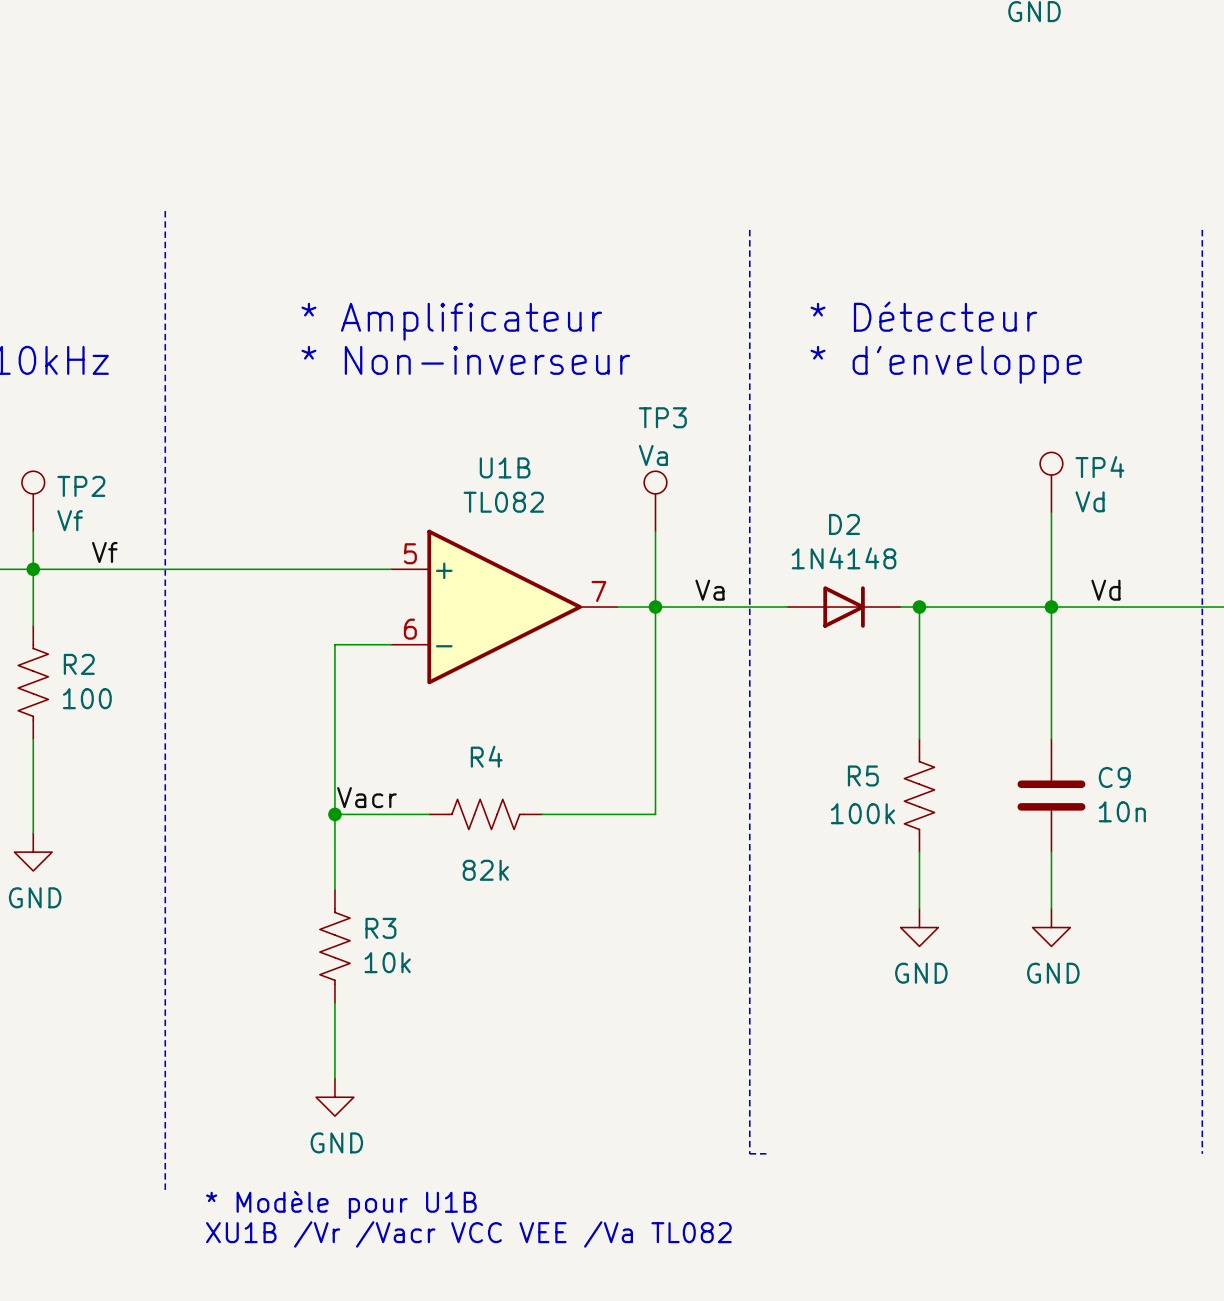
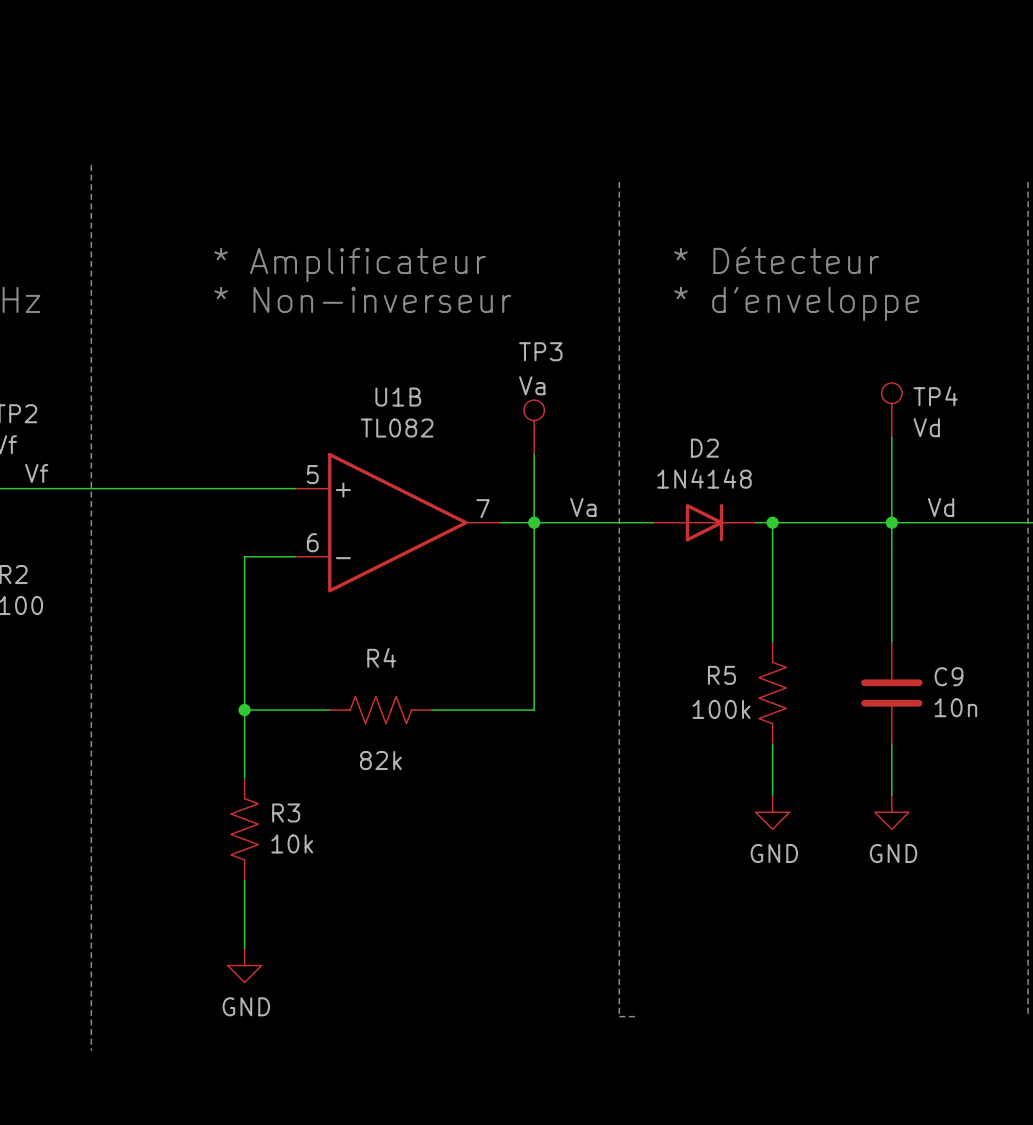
label: Vacr (366, 797) -> none
text: * Modèle pour U1B (341, 1204) -> none
text: XU1B /Vr /Vacr VCC VEE /Va TL082 (468, 1234) -> none

